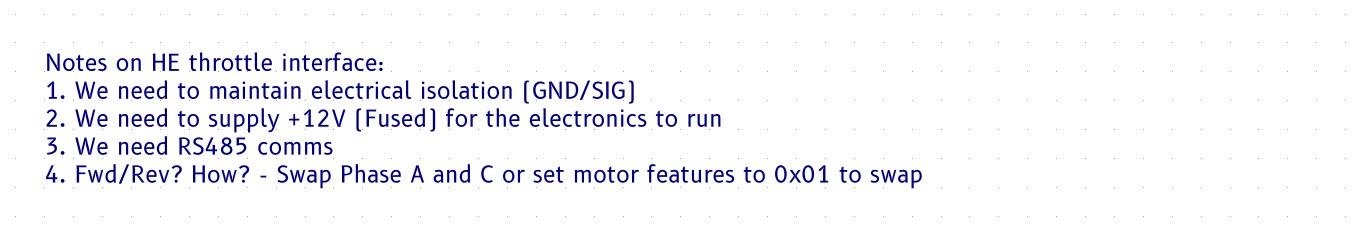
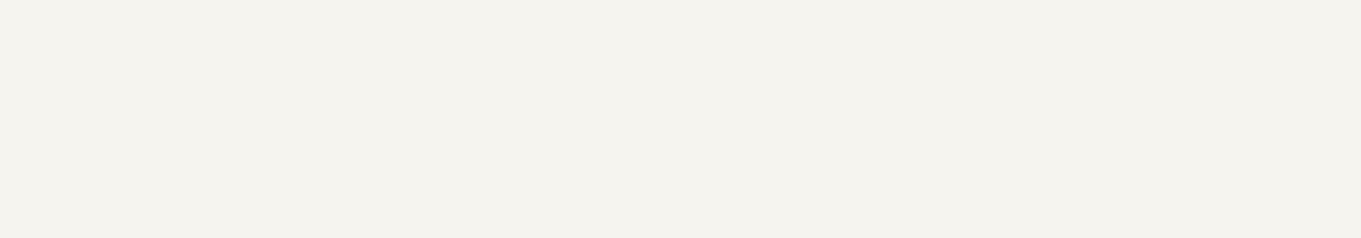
text: Notes on HE throttle interface: (214, 61) -> none
text: 1. We need to maintain electrical isolation (GND/SIG) (340, 91) -> none
text: 2. We need to supply +12V (Fused) for the electronics to run (383, 120) -> none
text: 3. We need RS485 comms (189, 145) -> none
text: 4. Fwd/Rev? How? - Swap Phase A and C or set motor features to 0x01 to swap (483, 176) -> none

